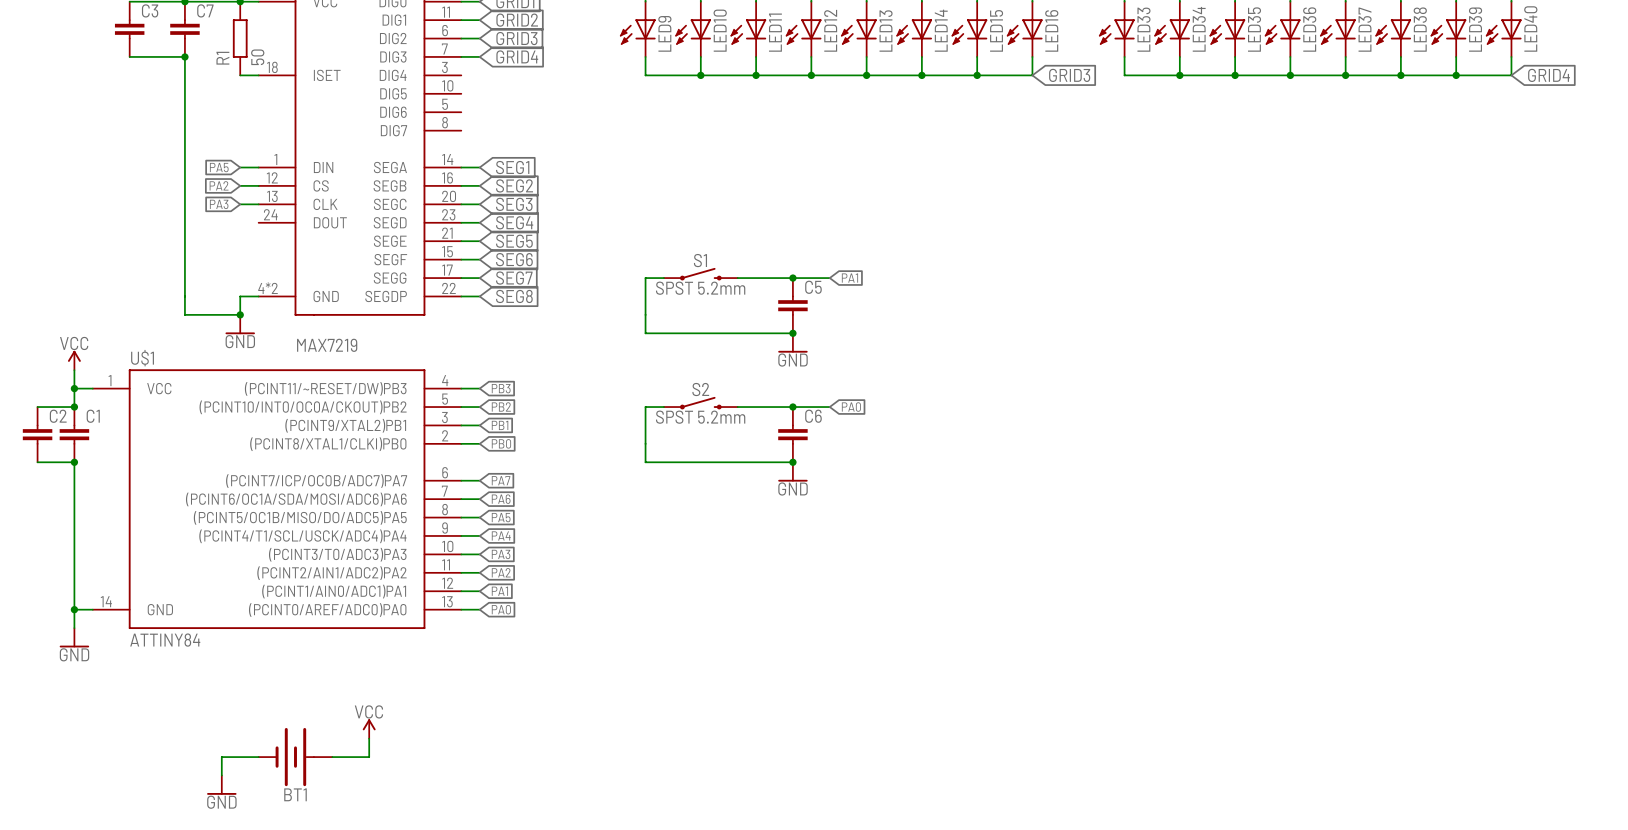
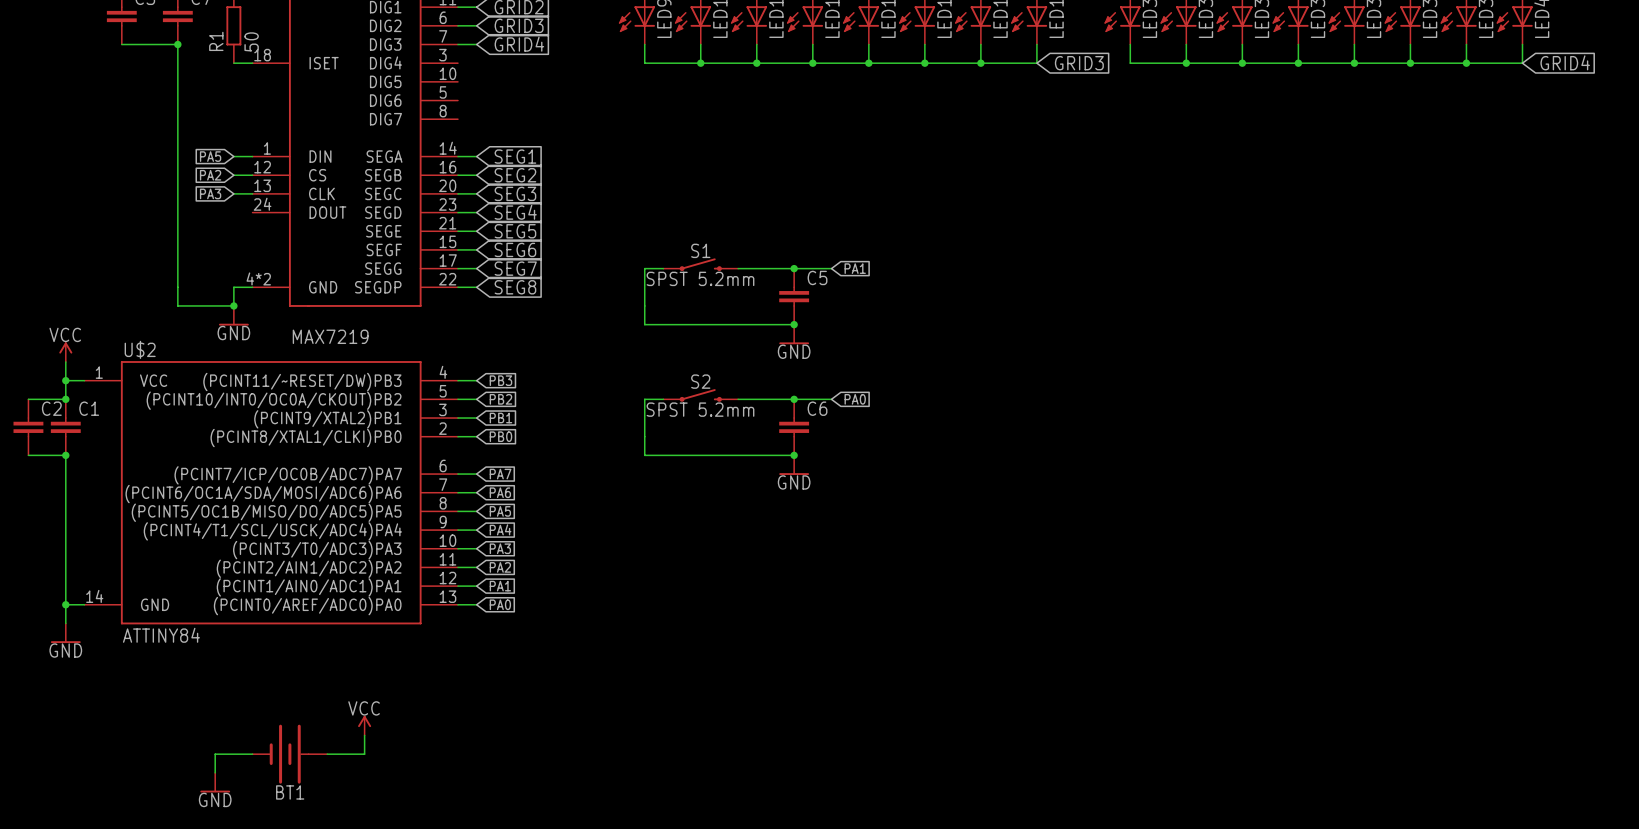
U$1 name: U$1 (142, 358) -> U$2 (140, 349)

